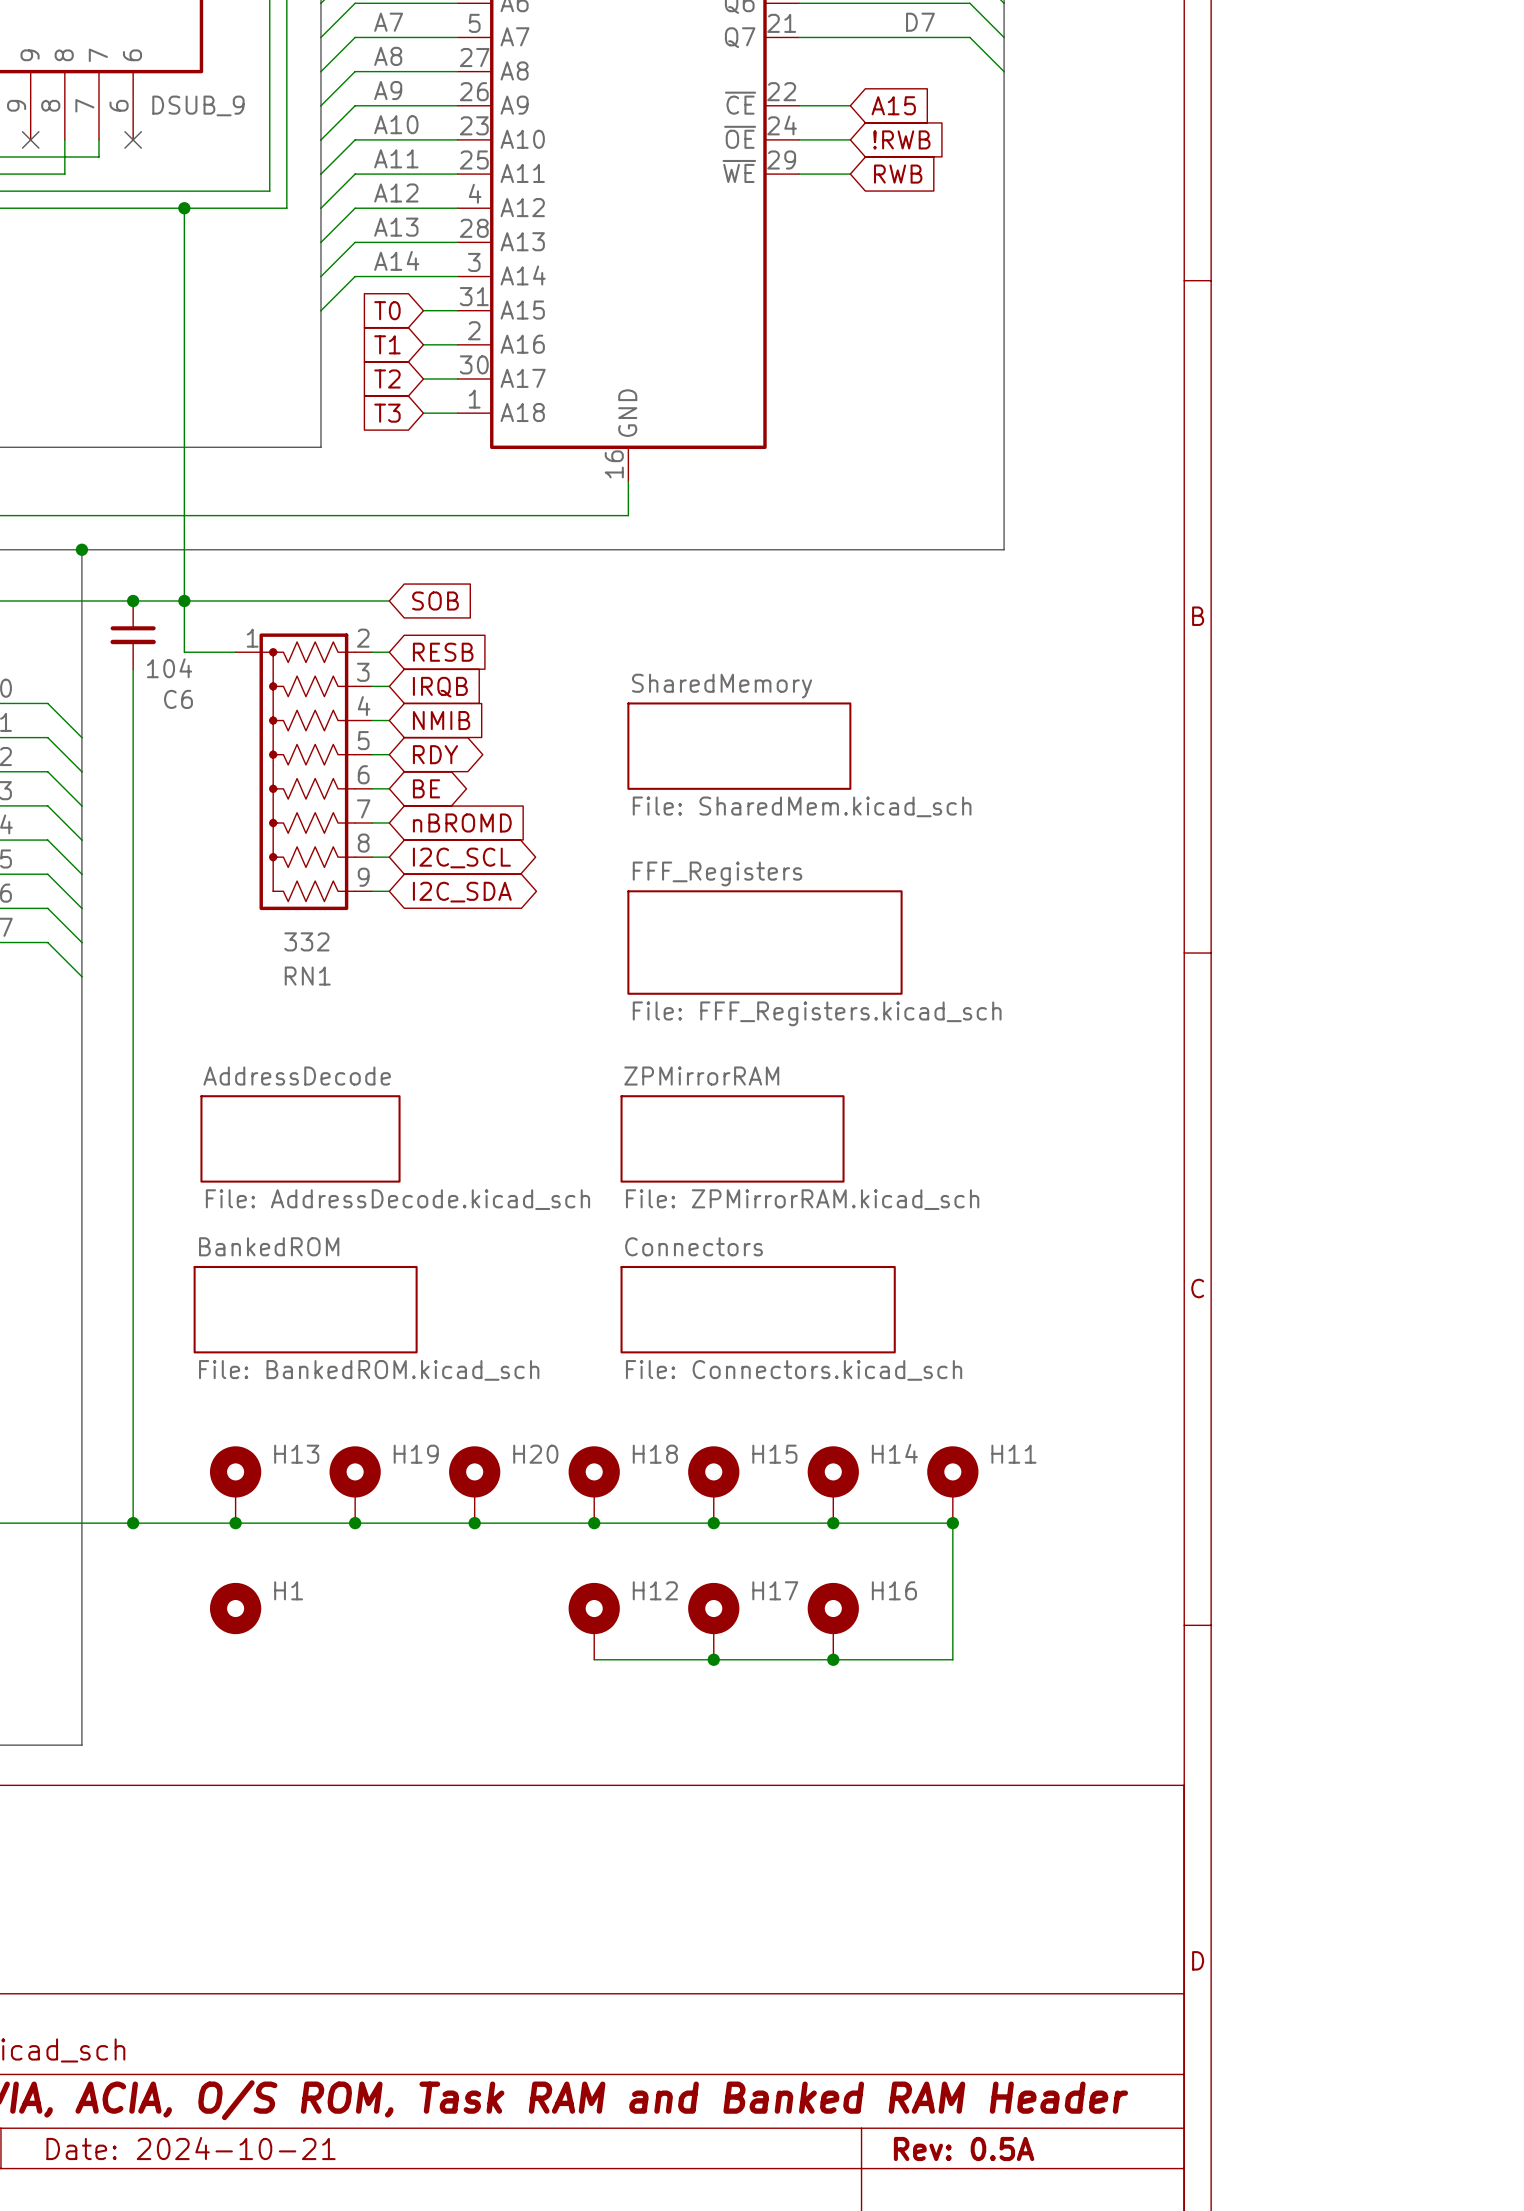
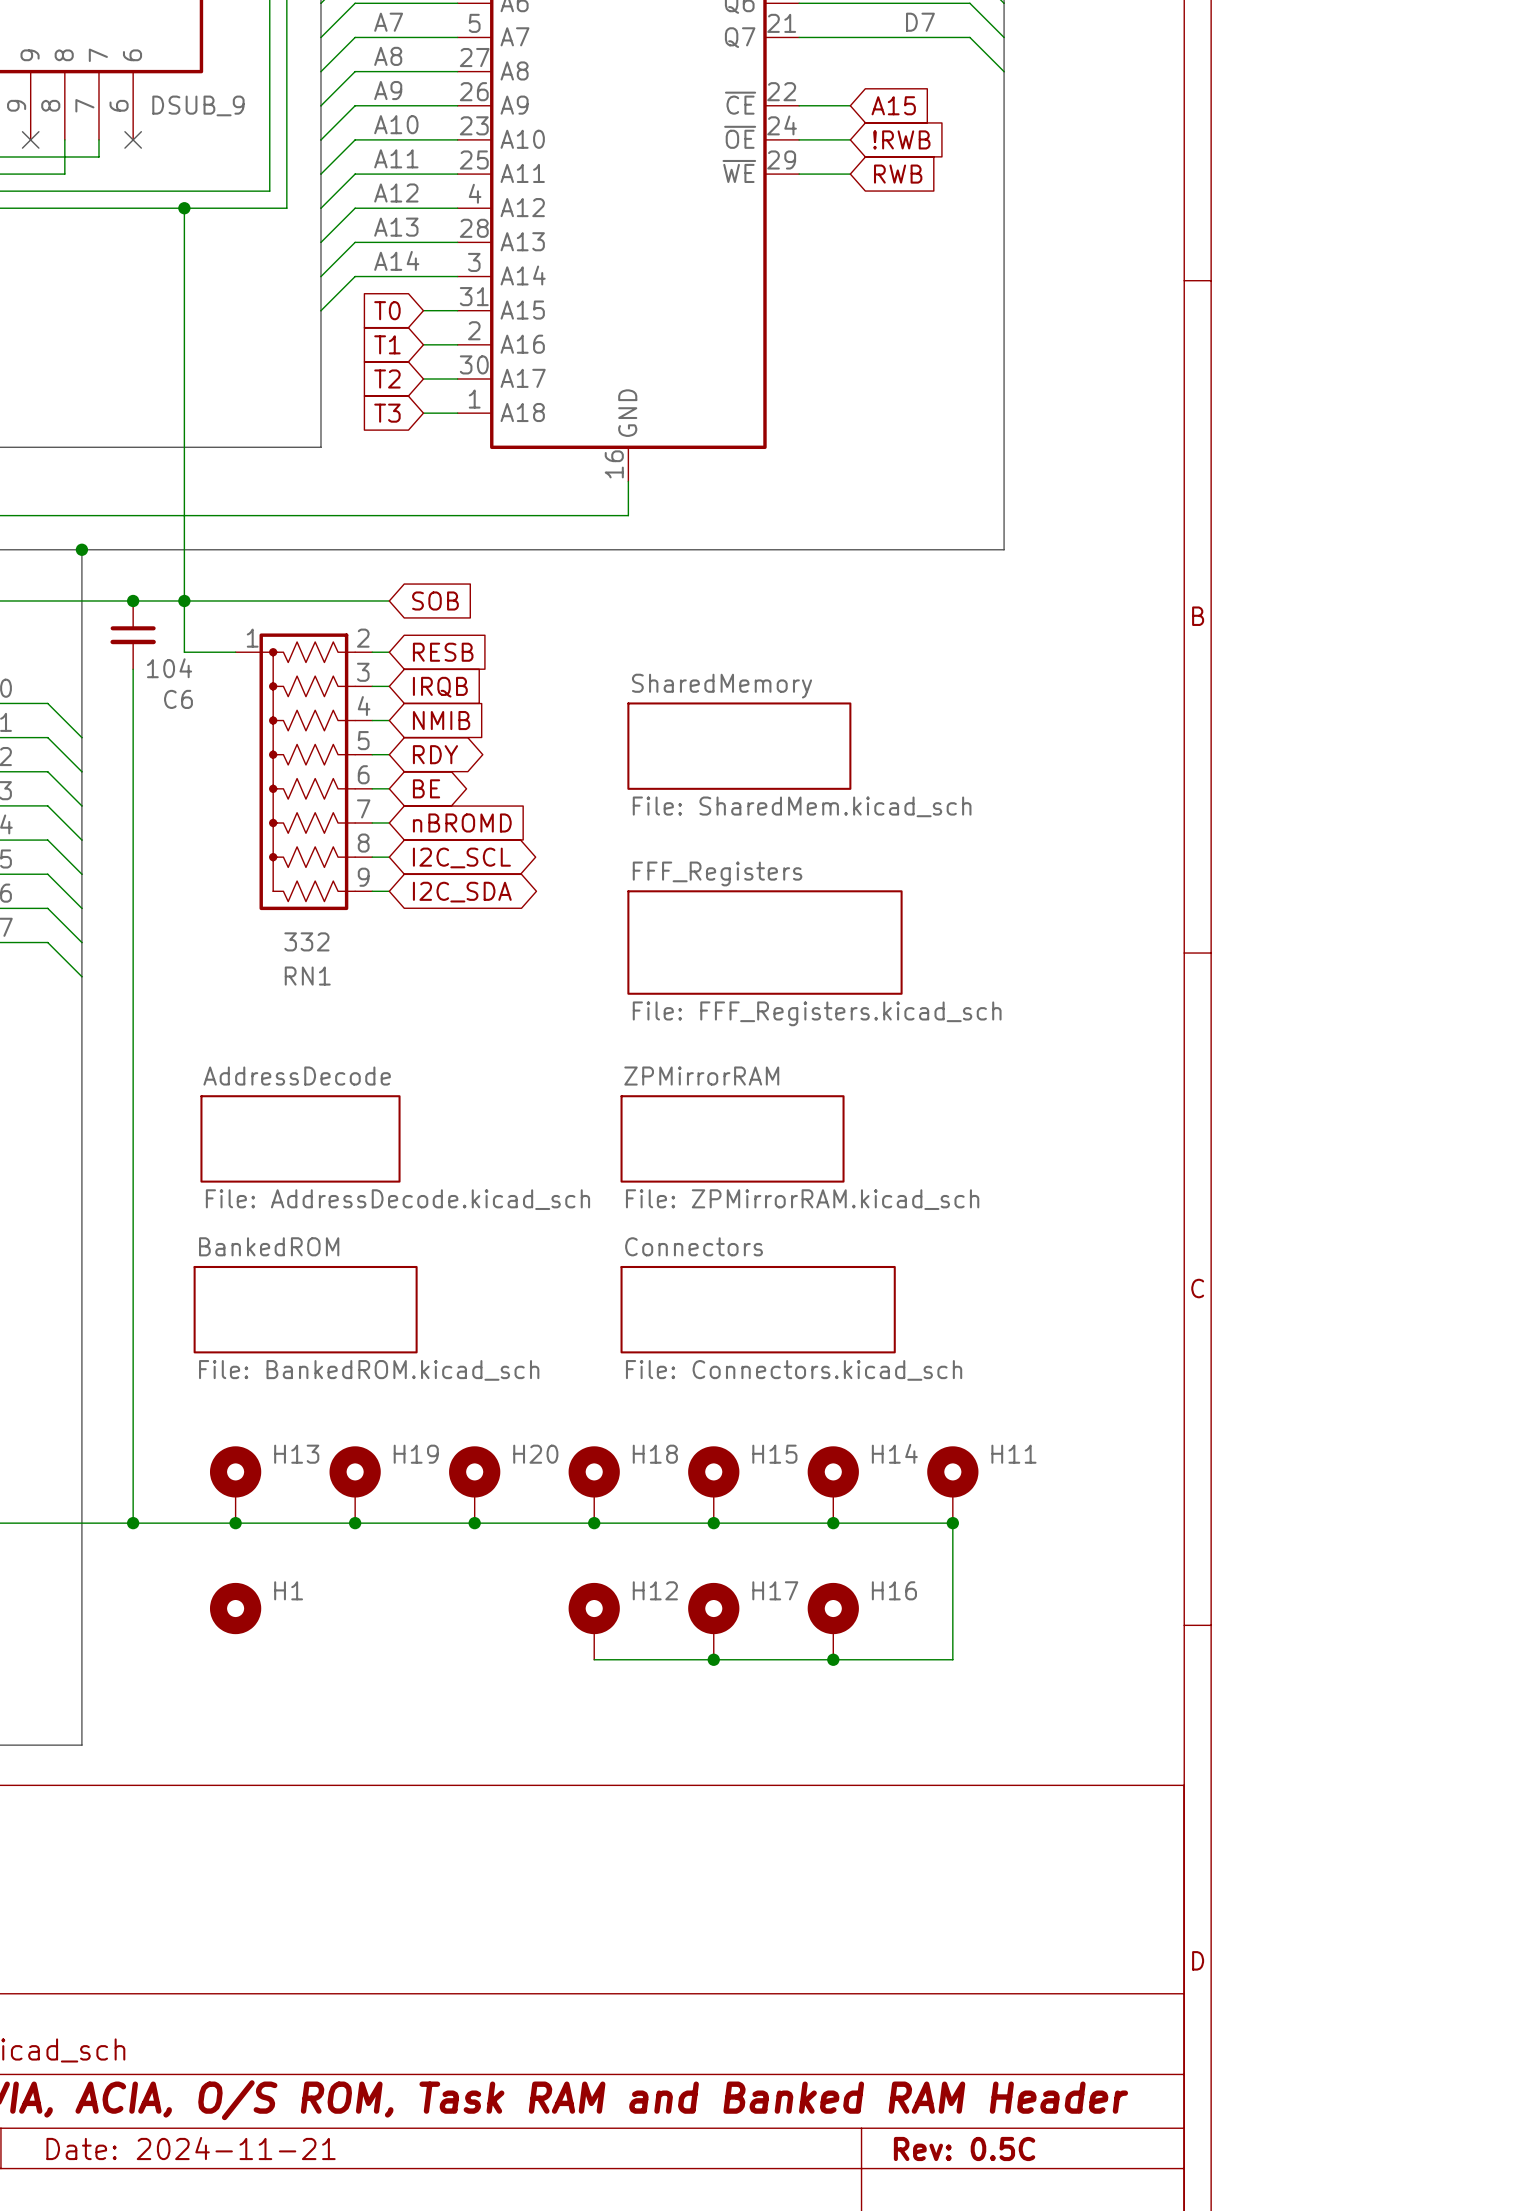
title block: Date: 2024-10-21 (191, 2148) -> Date: 2024-11-21 (191, 2148)
title block: Rev: 0.5A (964, 2148) -> Rev: 0.5C (964, 2148)

